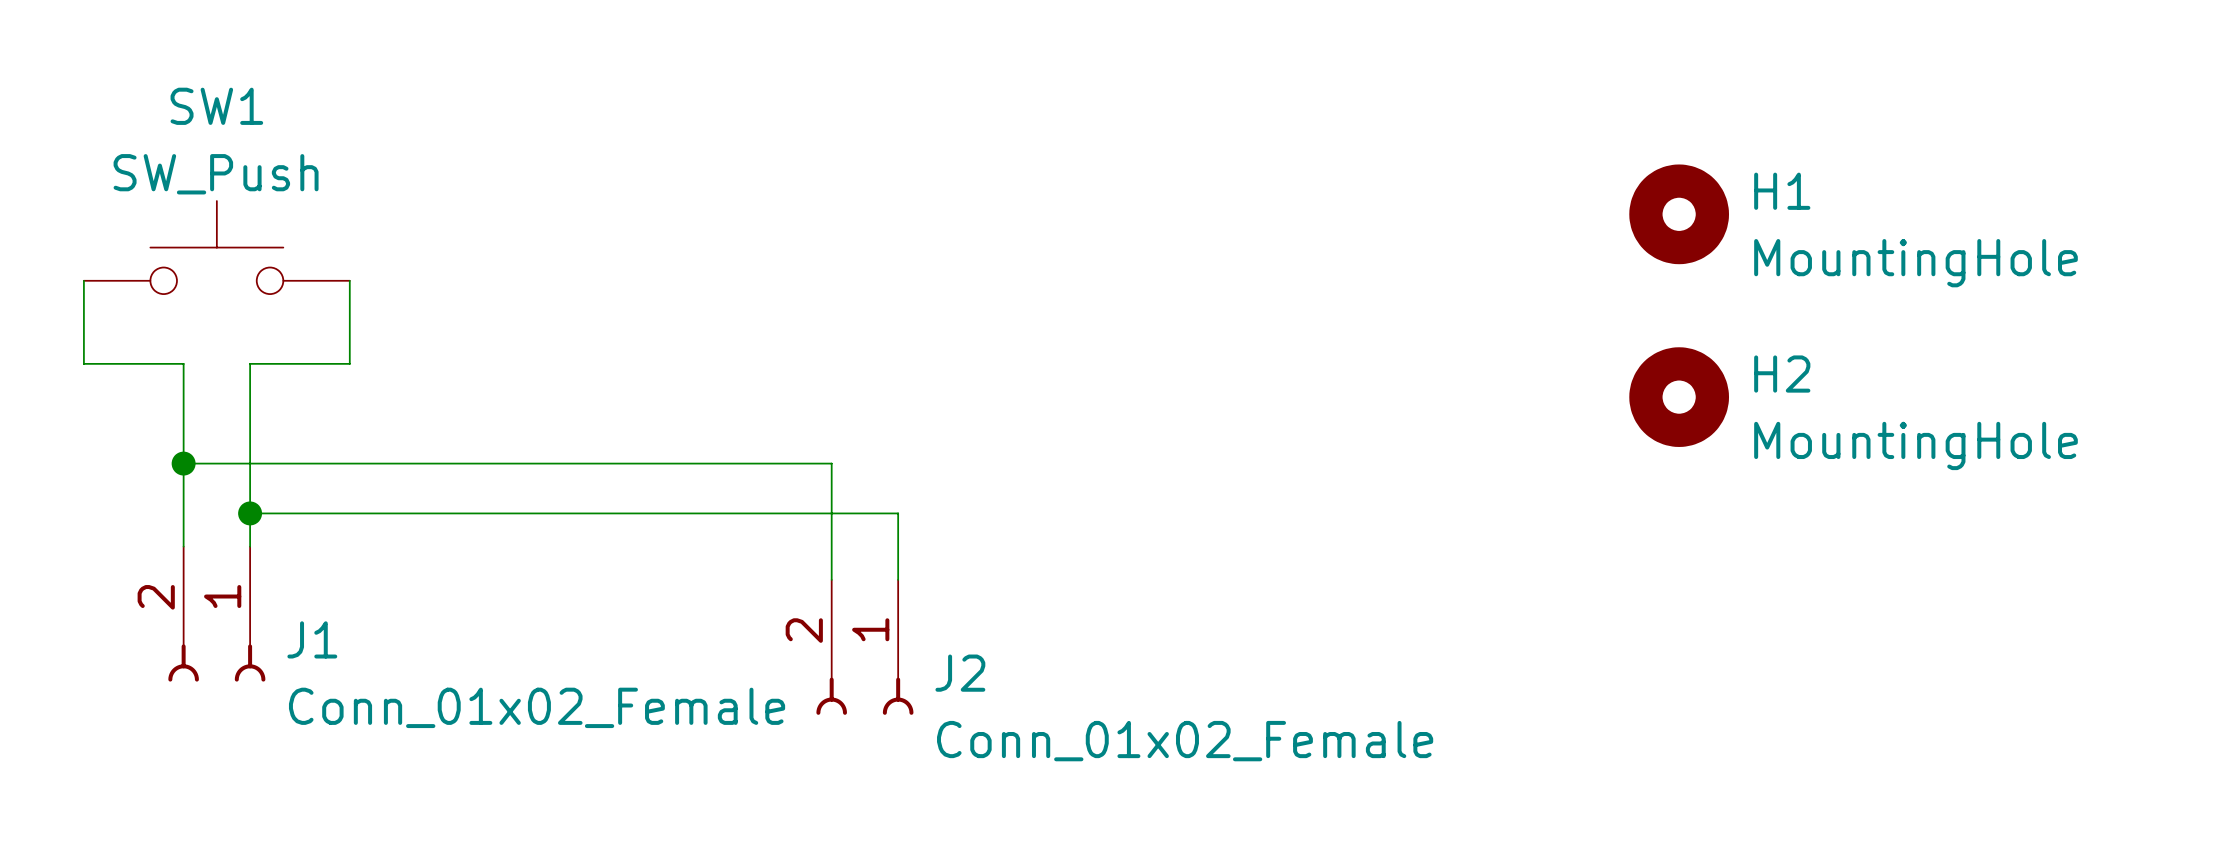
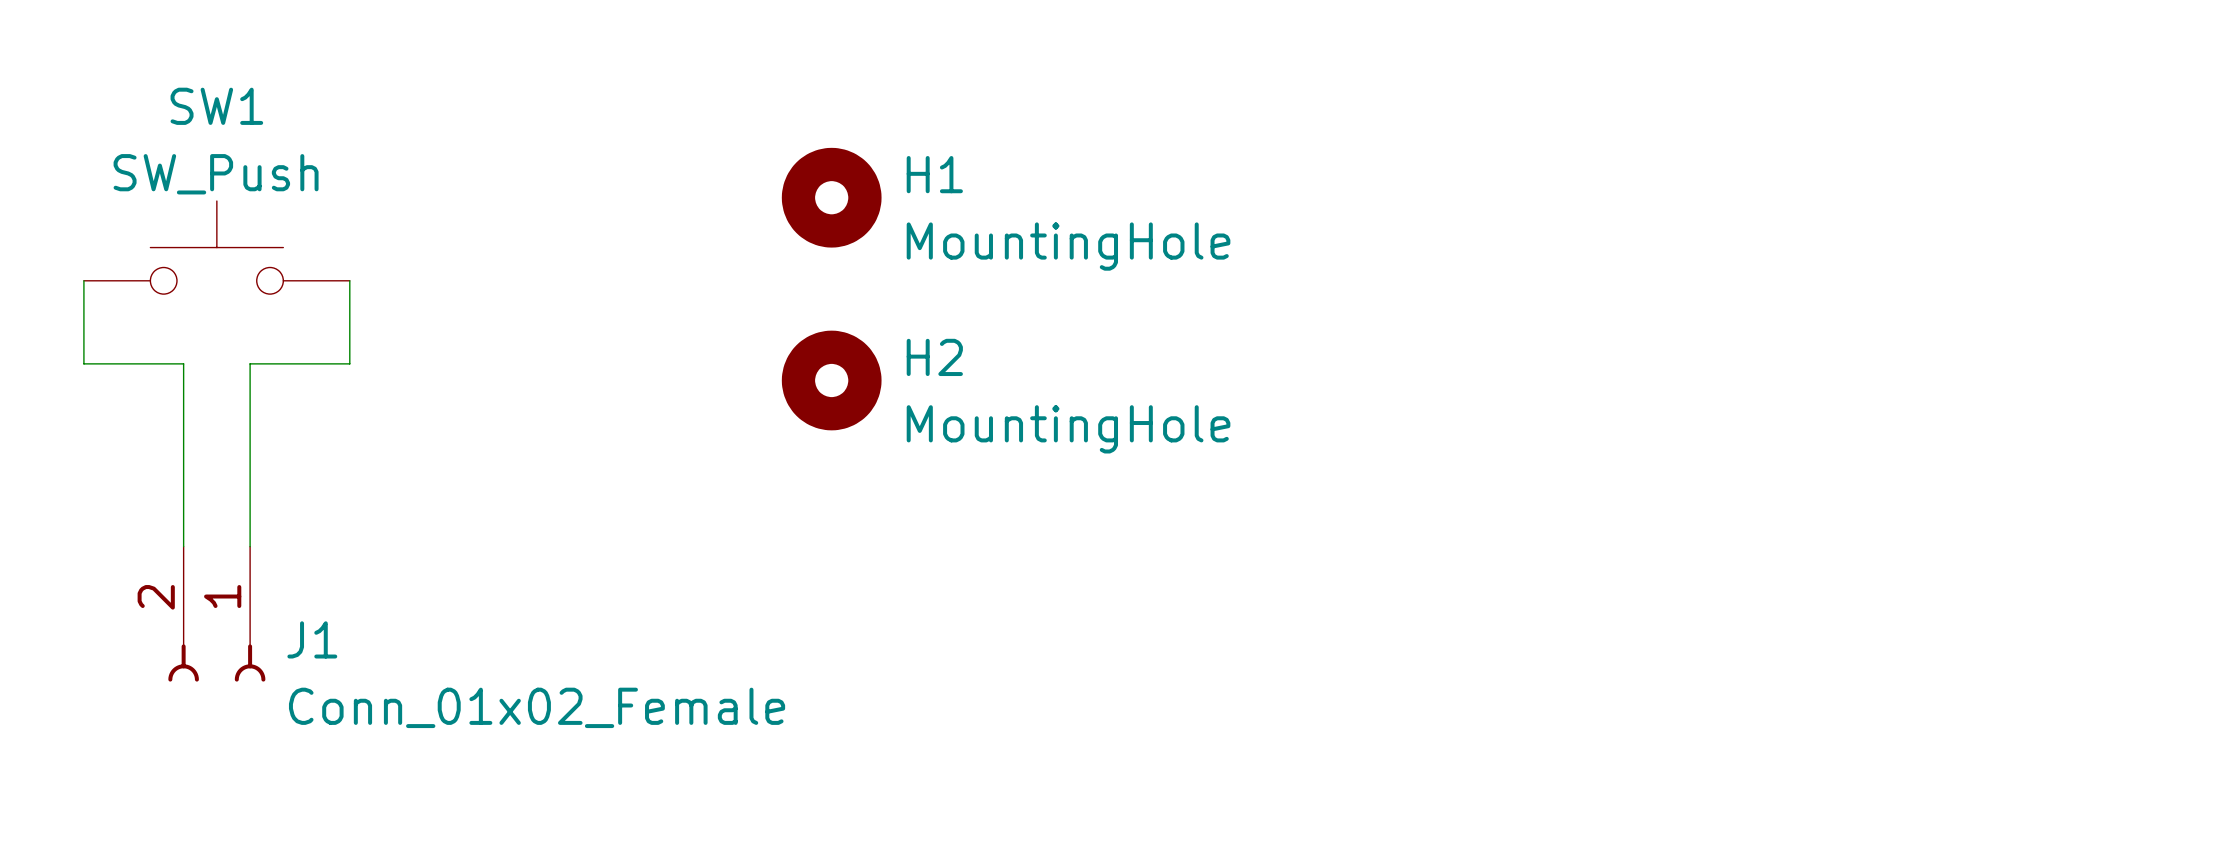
H1 position: (1679, 214) -> (831, 197)
H2 position: (1679, 397) -> (831, 380)
wire: (183, 463) (831, 463) (831, 579) -> none
junction: (183, 463) -> none
wire: (250, 513) (898, 513) (898, 579) -> none
junction: (250, 513) -> none
J2: Conn_01x02_Female (864, 647) -> none

